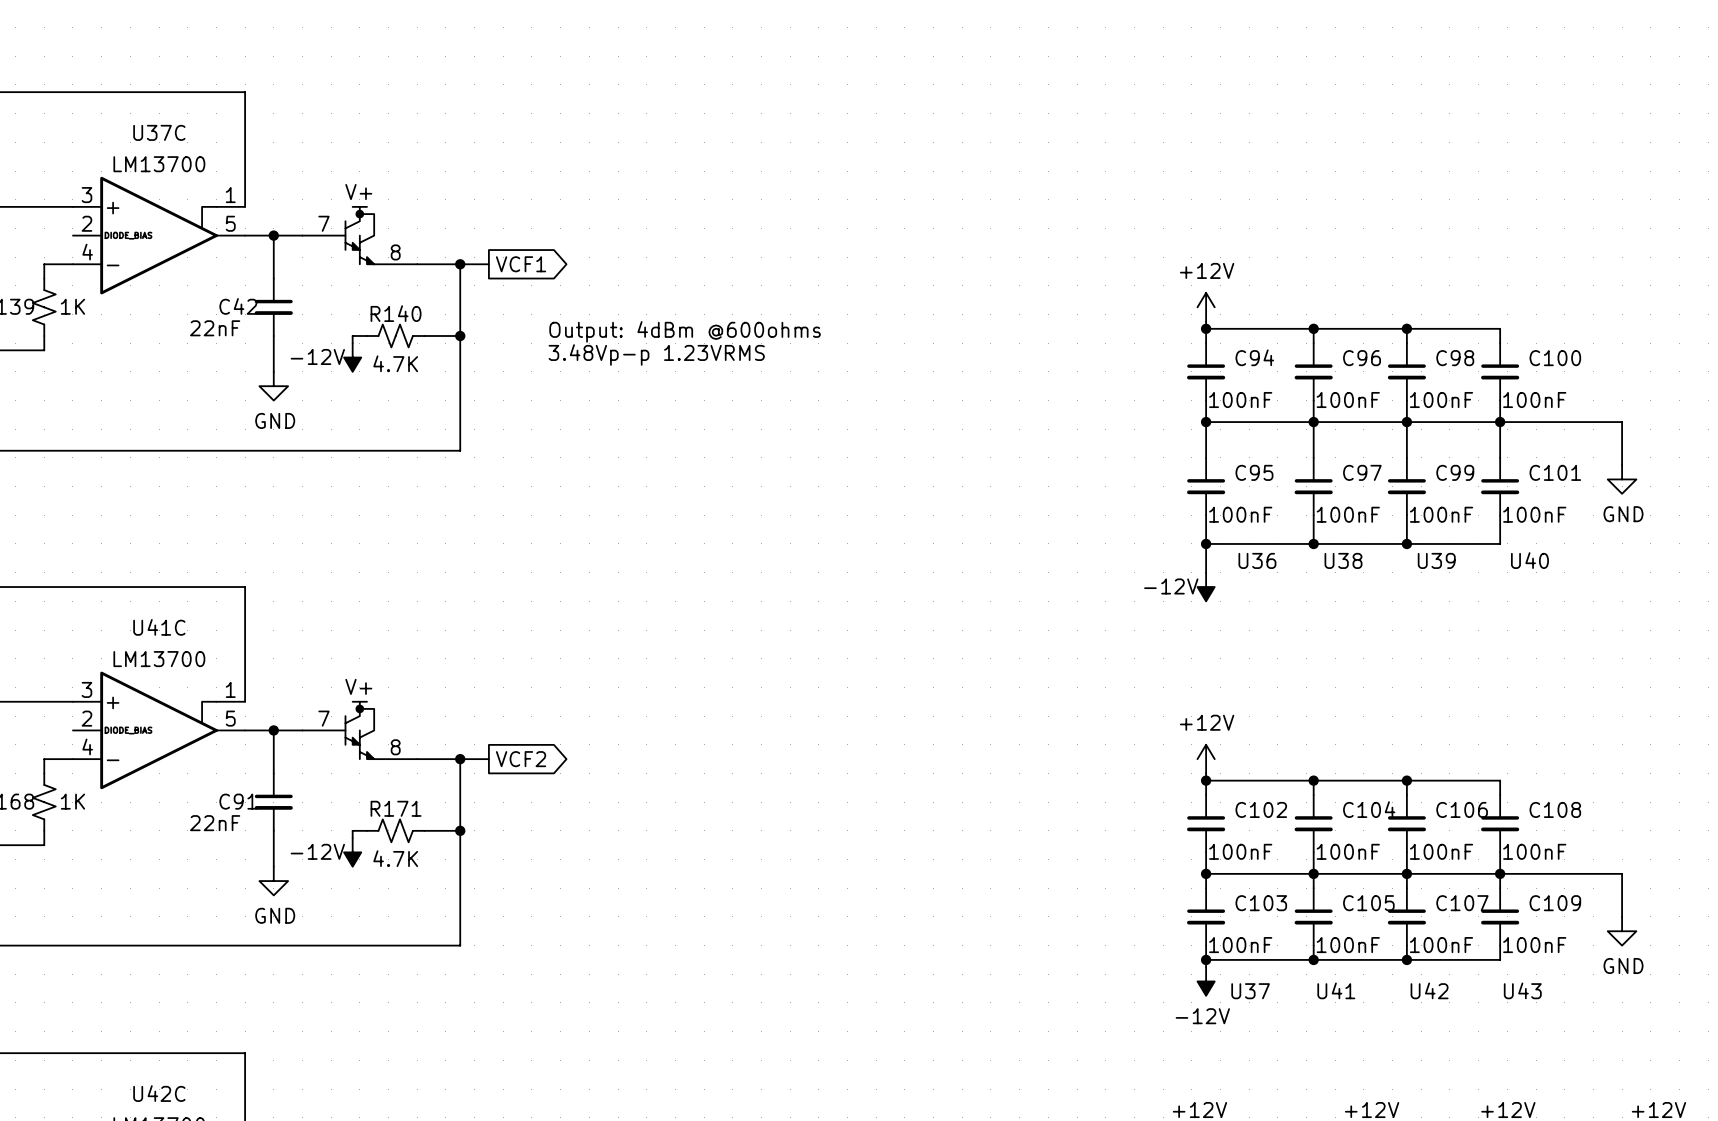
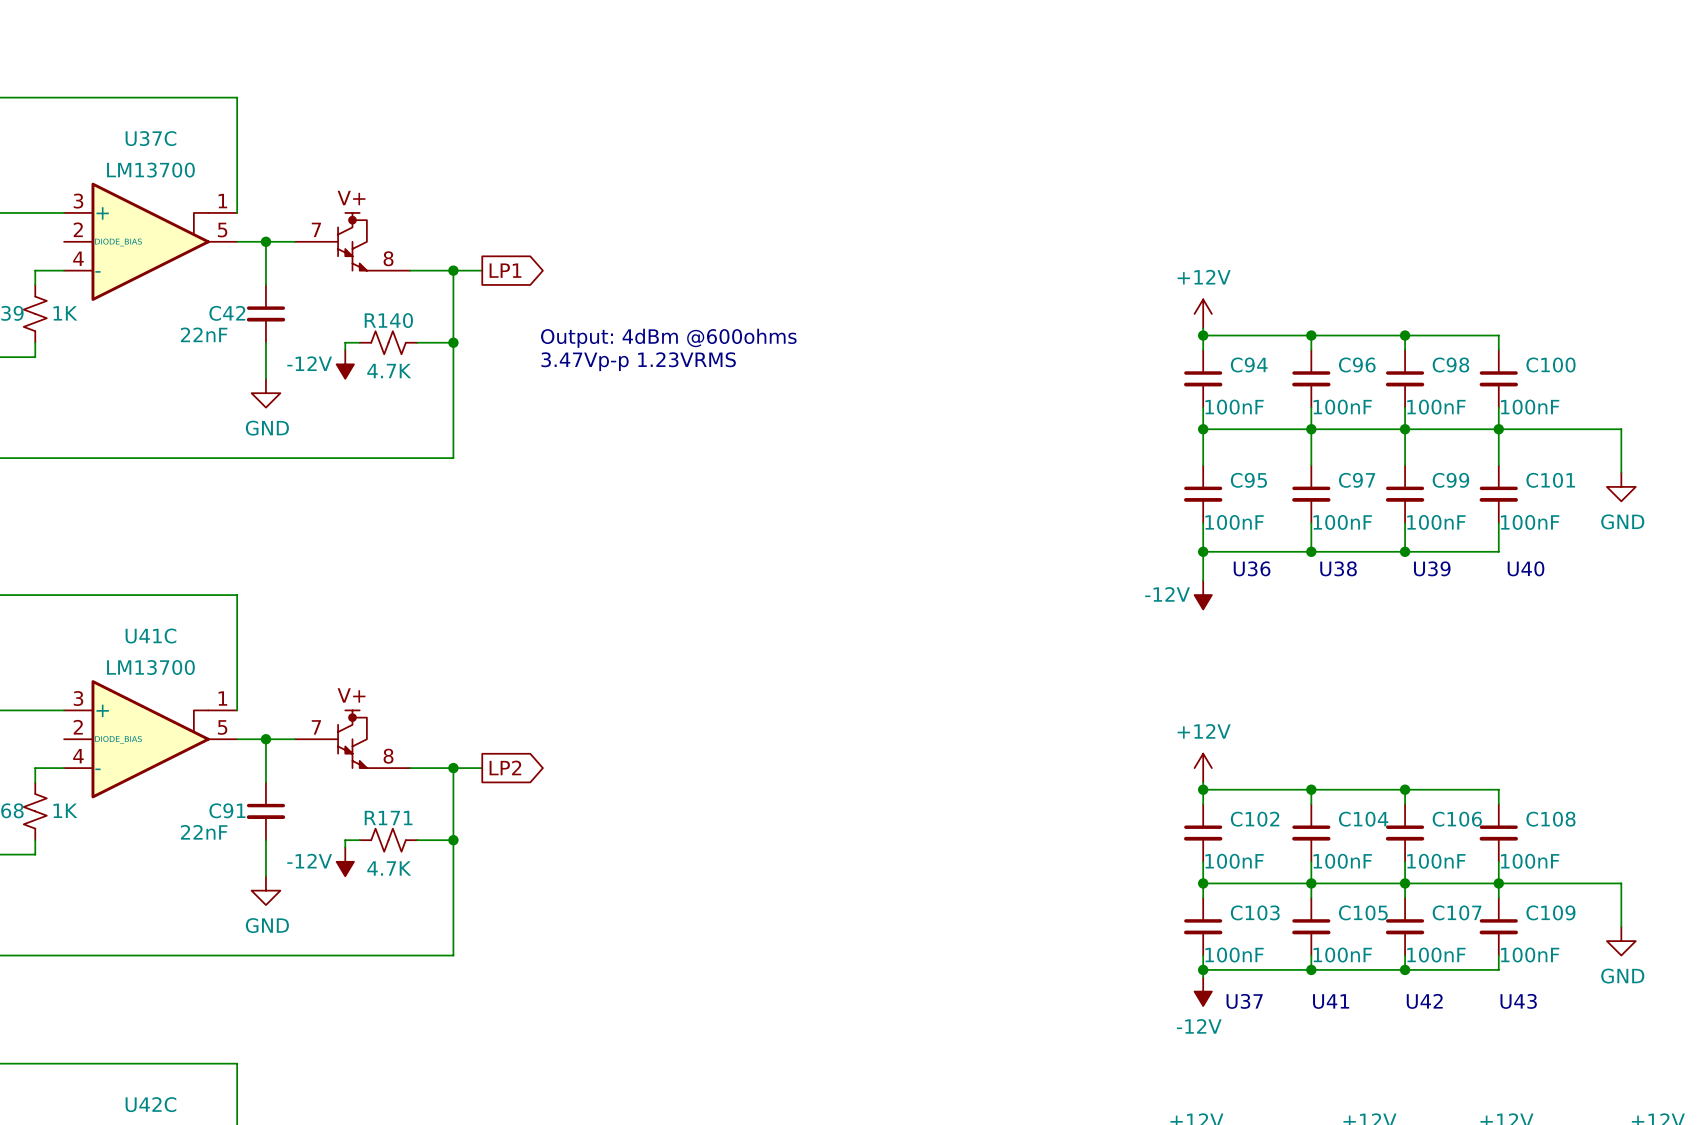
global label: VCF1 (521, 264) -> LP1 (505, 270)
text: 3.48Vp-p 1.23VRMS (656, 354) -> 3.47Vp-p 1.23VRMS (638, 361)
global label: VCF2 (521, 759) -> LP2 (505, 767)

